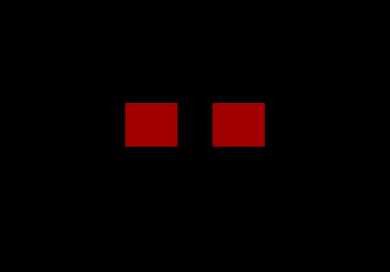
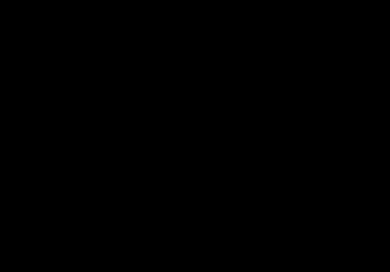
part: (194, 124) -> none

